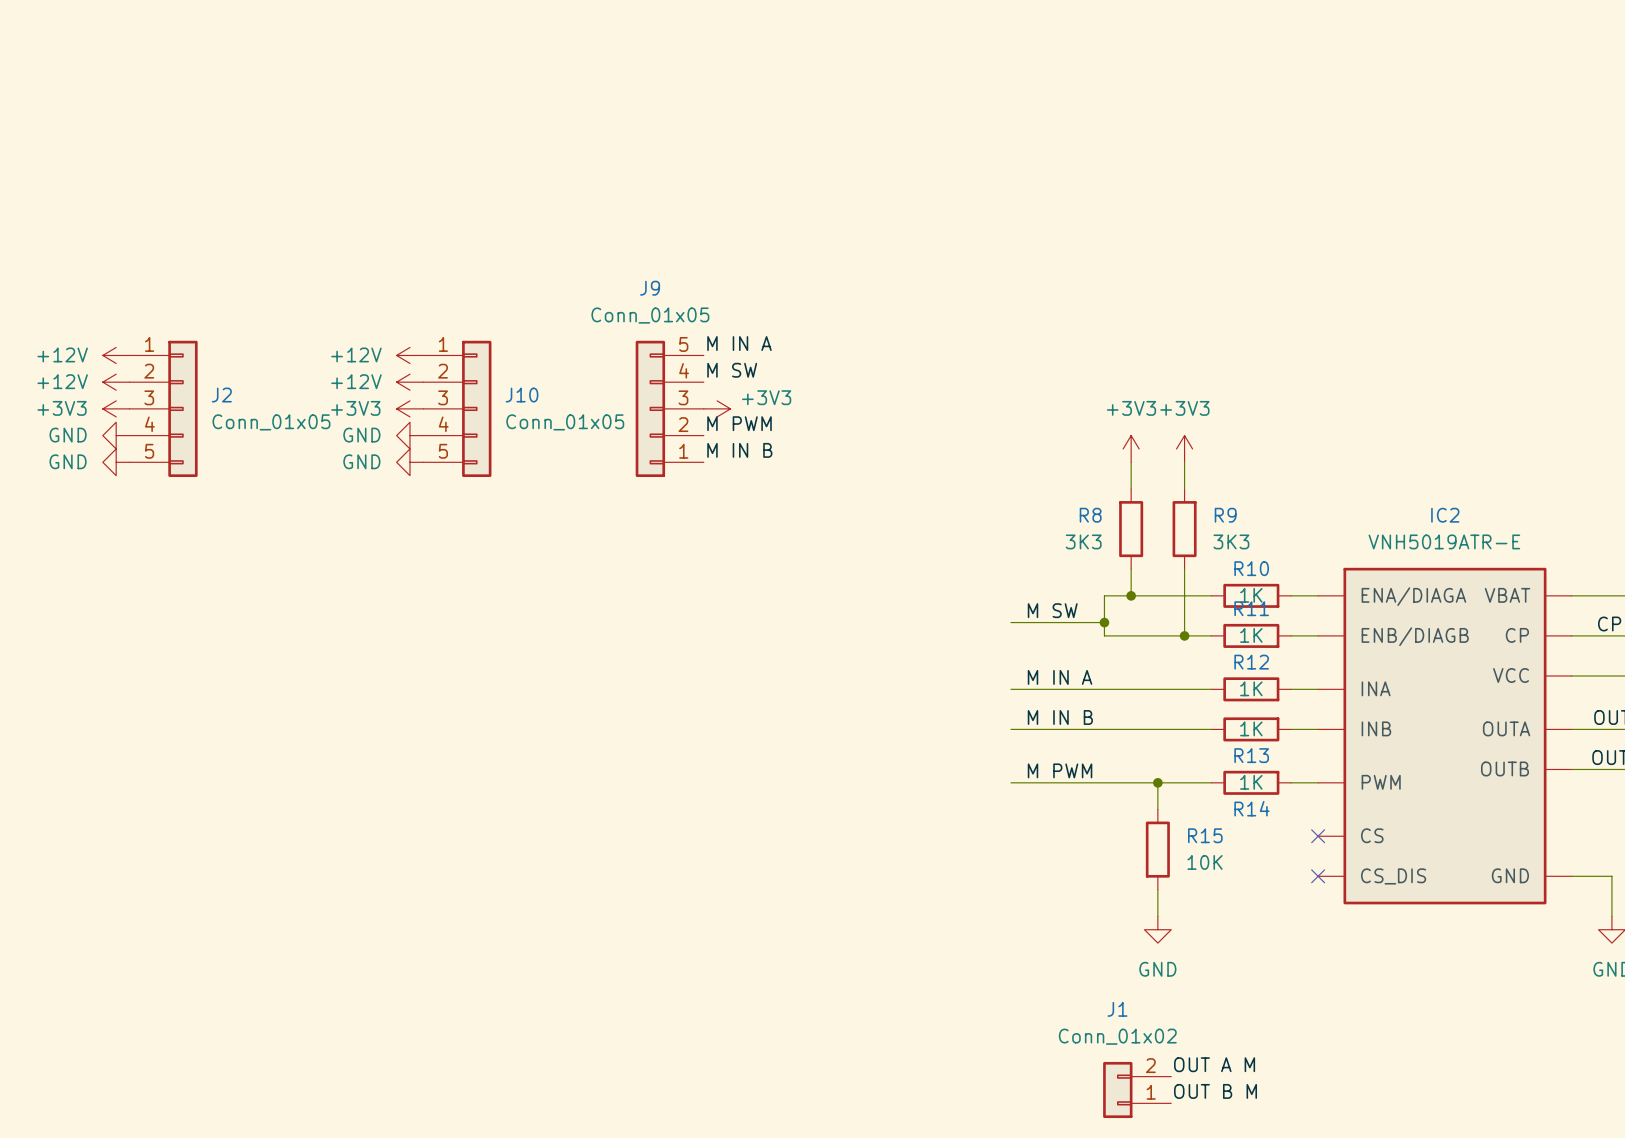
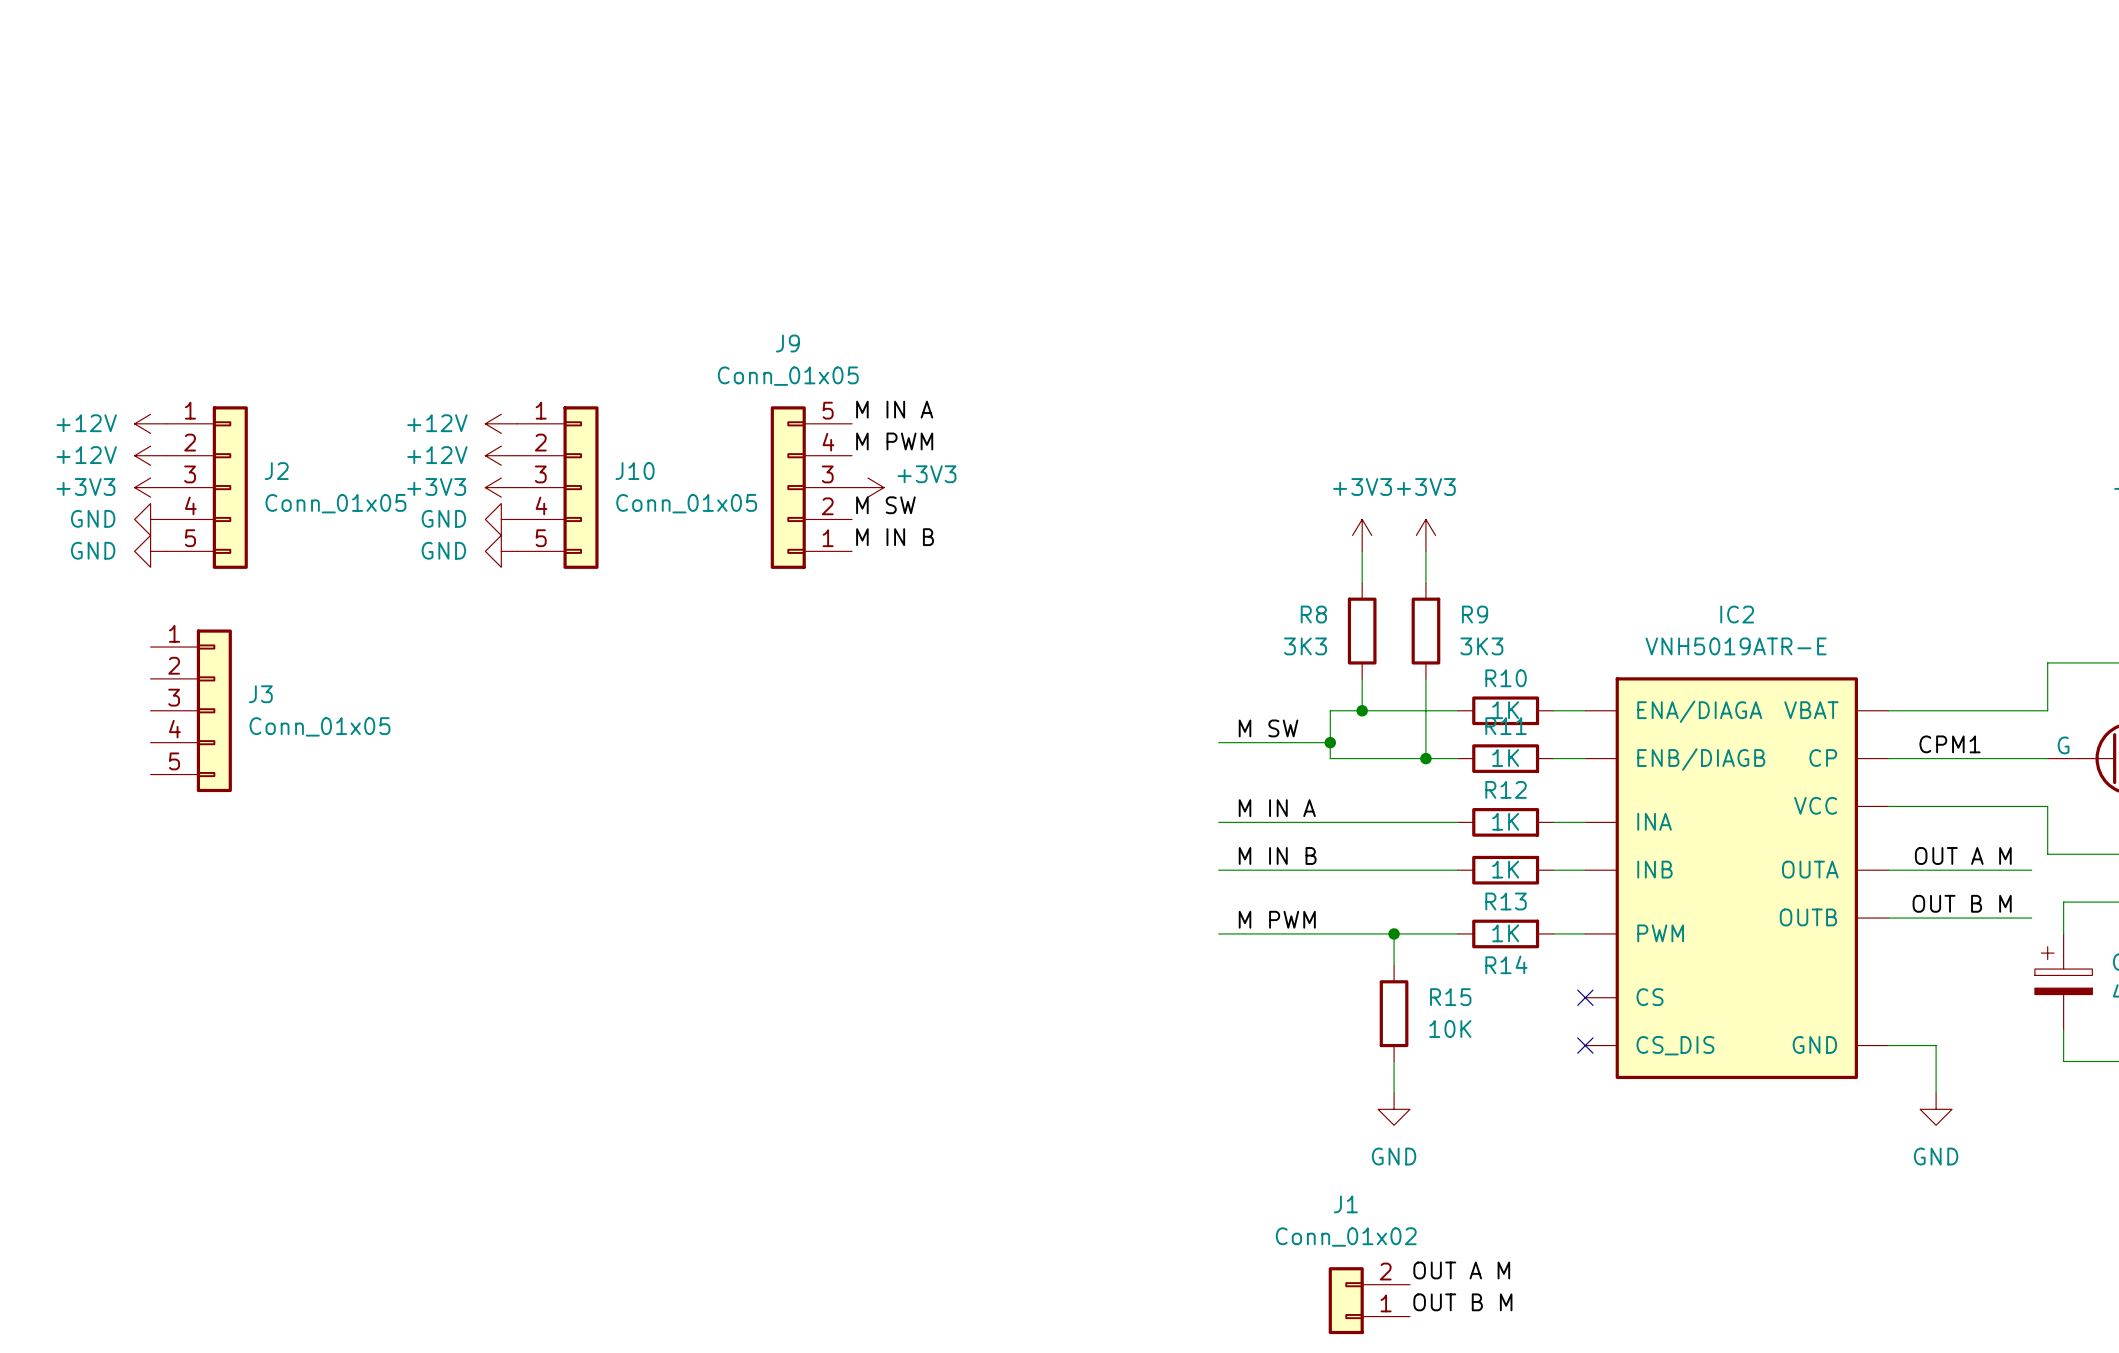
label: M SW (732, 370) -> M PWM (894, 441)
label: M PWM (739, 423) -> M SW (885, 505)
J3: none -> Conn_01x05 (191, 710)

